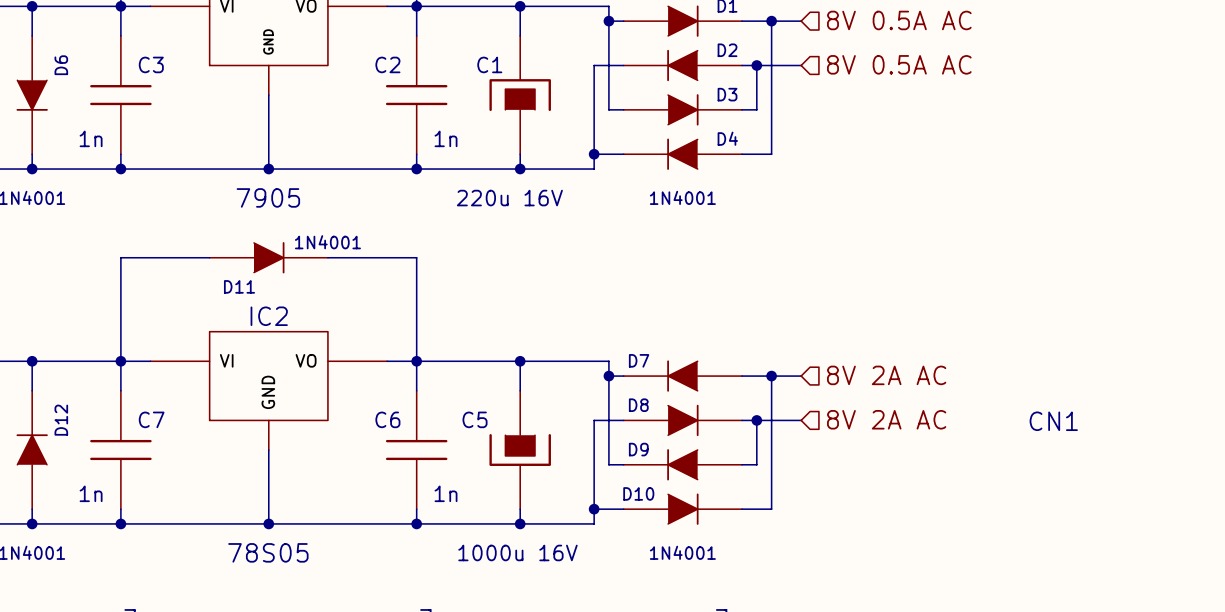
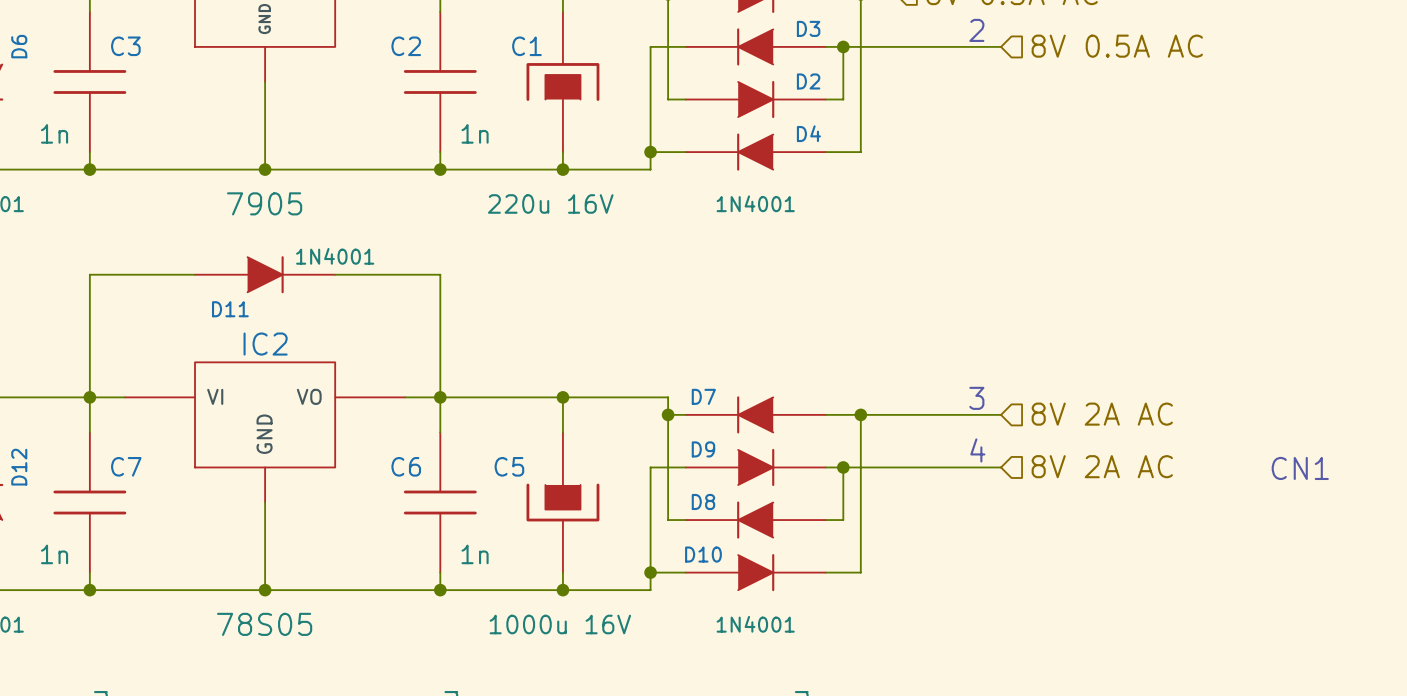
D2 name position: D2 (727, 50) -> D2 (808, 81)
text: none -> 2 (976, 30)
hierarchical label position: 8V 0.5A AC (899, 64) -> 8V 0.5A AC (1117, 46)
wire: none -> (895, 46) (1001, 46)
D3 name position: D3 (727, 94) -> D3 (808, 28)
text: none -> 3 (976, 398)
hierarchical label position: 8V 2A AC (886, 375) -> 8V 2A AC (1102, 414)
wire: none -> (895, 414) (1001, 414)
D8 name position: D8 (638, 405) -> D8 (703, 501)
text: none -> 4 (977, 450)
hierarchical label position: 8V 2A AC (886, 419) -> 8V 2A AC (1102, 466)
wire: none -> (895, 467) (1001, 467)
text position: CN1 (1053, 421) -> CN1 (1300, 468)
D9 name position: D9 (638, 449) -> D9 (703, 449)

